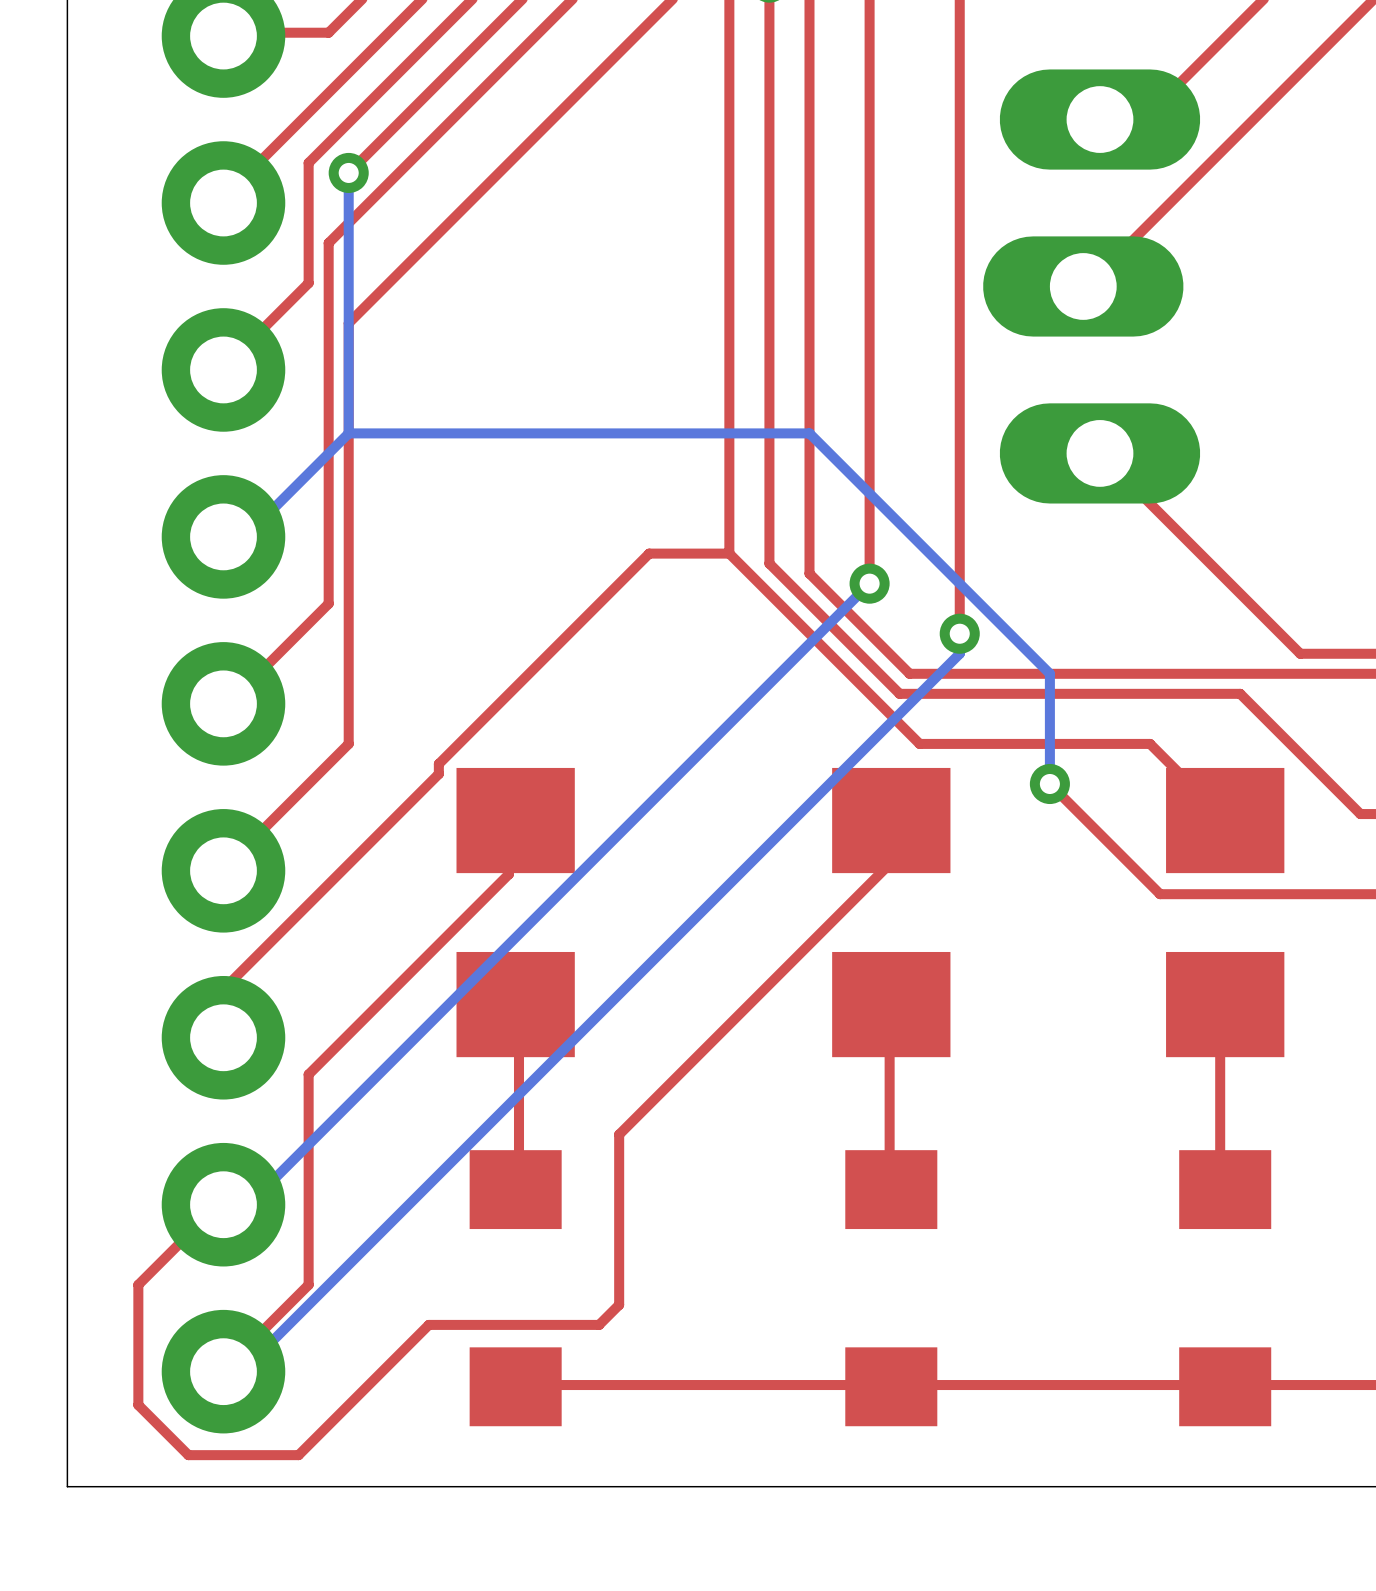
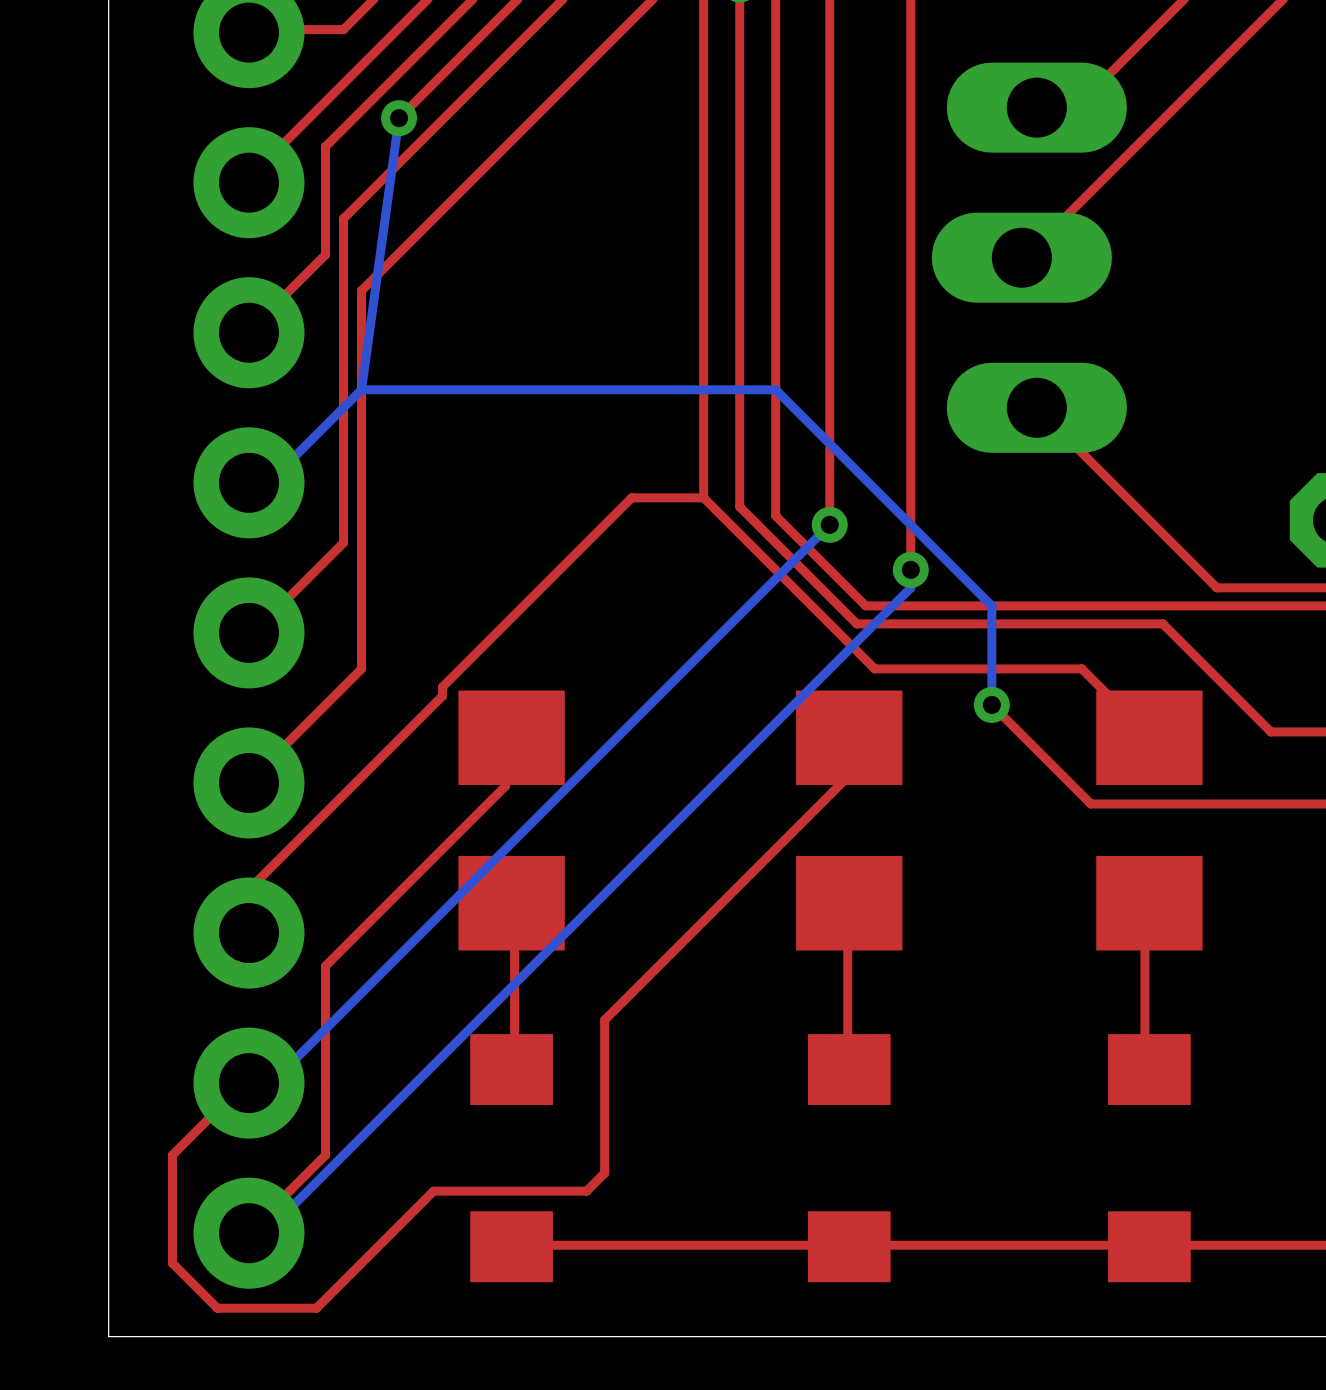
top track: (390, 131) (348, 172) -> none
bottom track: (348, 172) (348, 433) -> (399, 118) (361, 389)
via position: (348, 172) -> (399, 118)

